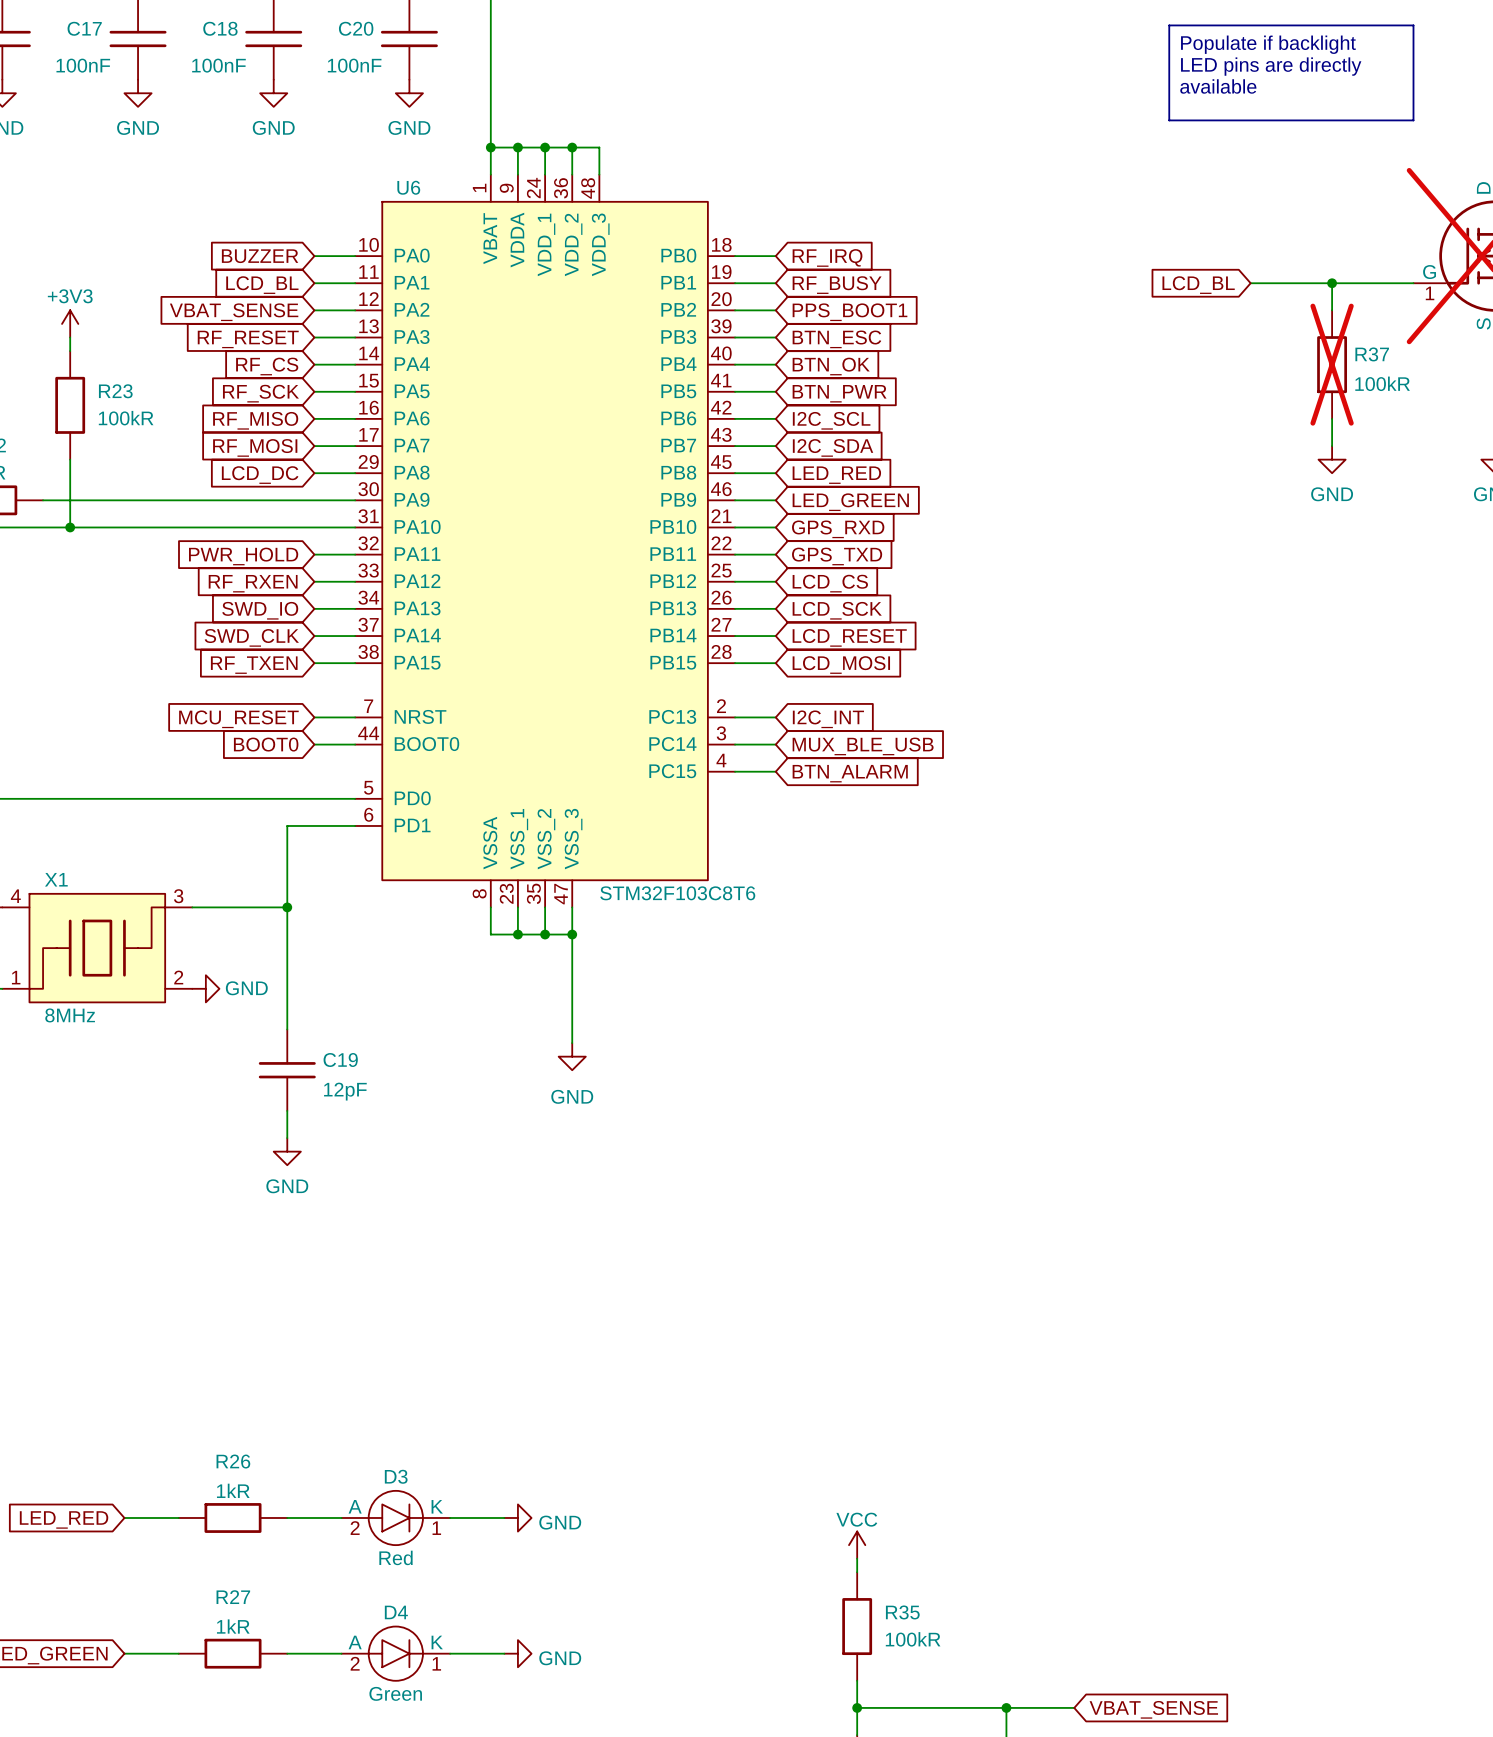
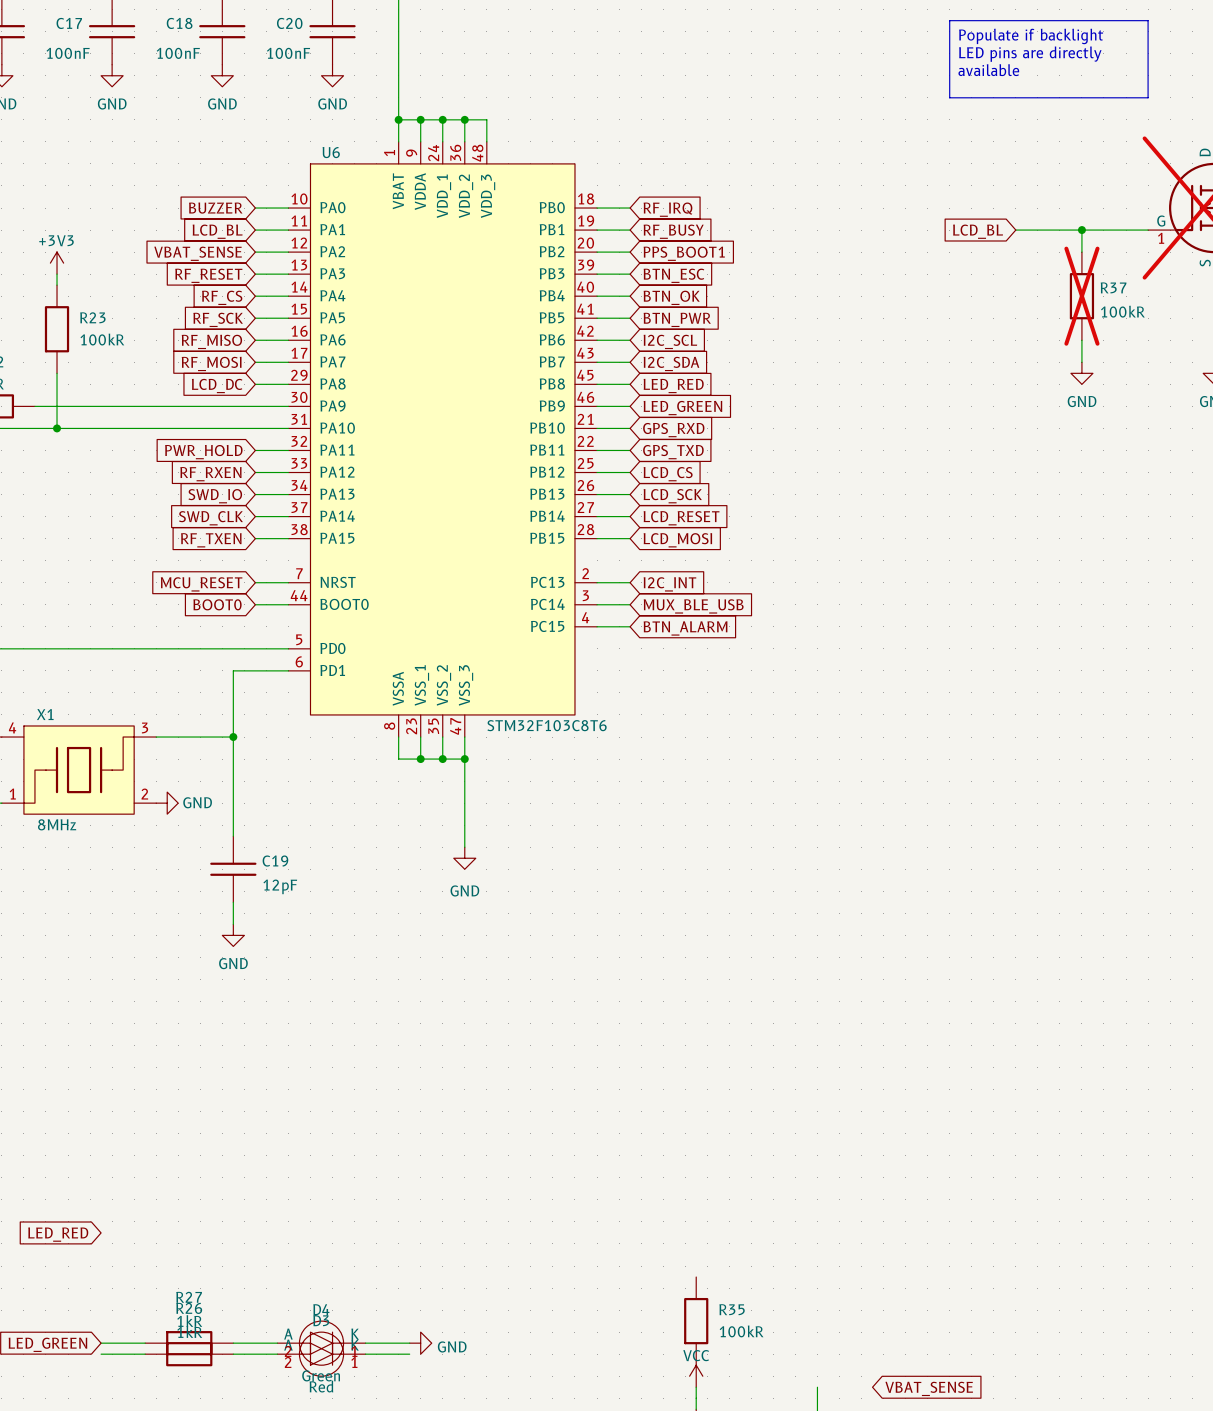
D3 position: (395, 1511) -> (321, 1348)
wire: (124, 1517) (178, 1517) -> (101, 1354) (145, 1354)
R26 position: (233, 1517) -> (189, 1354)
wire: (287, 1517) (341, 1517) -> (233, 1354) (277, 1354)
wire: (450, 1517) (504, 1517) -> (365, 1354) (409, 1354)
power symbol: GND (517, 1517) -> none
power symbol position: VCC (857, 1545) -> VCC (696, 1376)
wire: (857, 1558) (857, 1572) -> none
wire: (857, 1680) (857, 1707) (1074, 1707) -> none
junction: (857, 1707) -> none
junction: (1006, 1707) -> none

